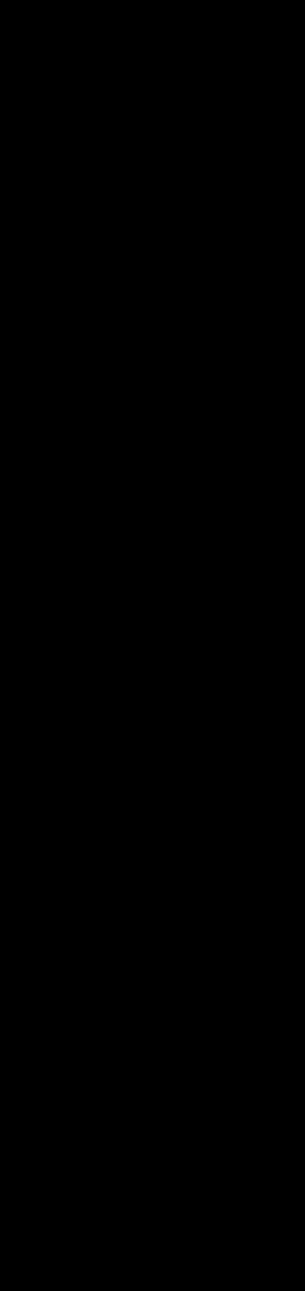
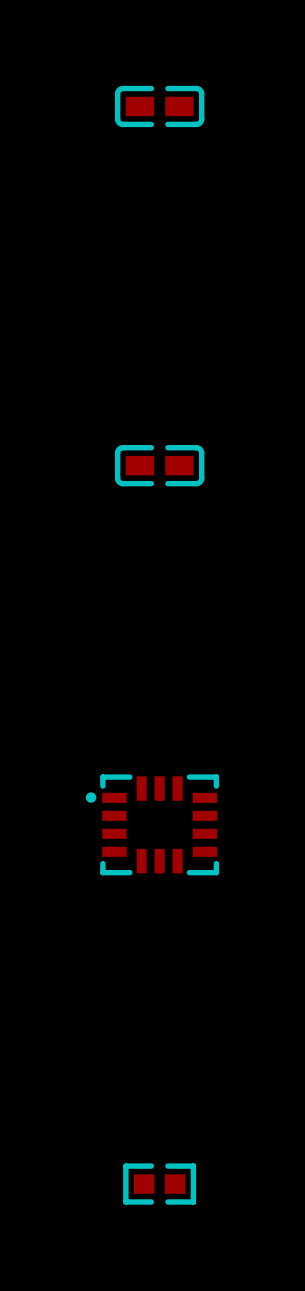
part: none -> (159, 106)
part: none -> (159, 465)
part: none -> (152, 824)
part: none -> (159, 1184)

